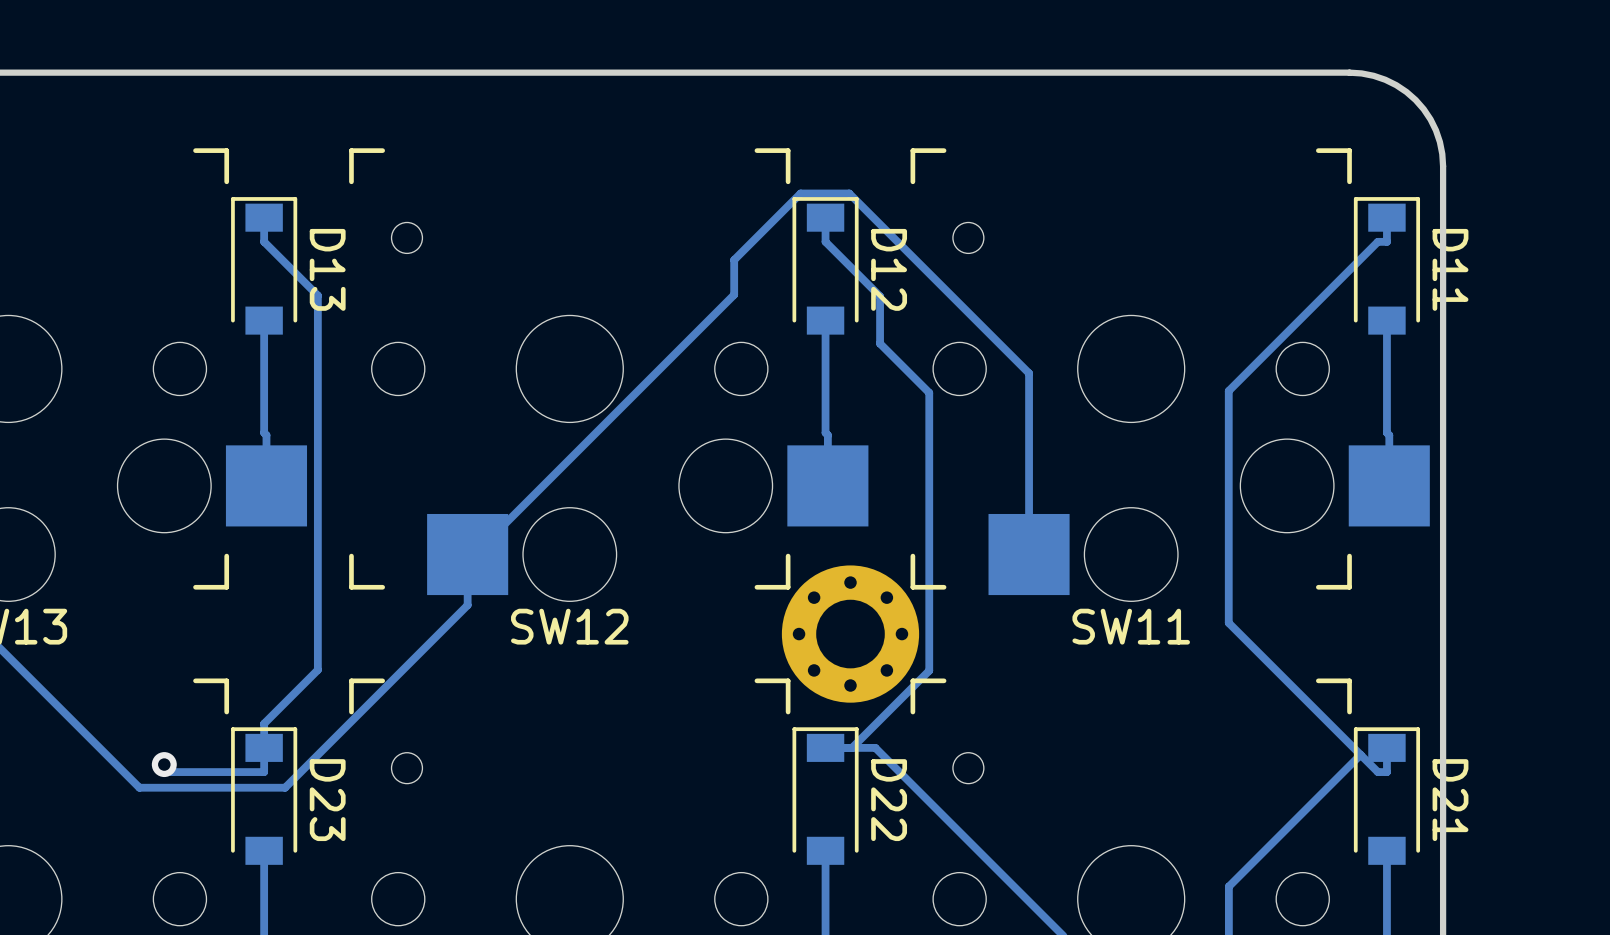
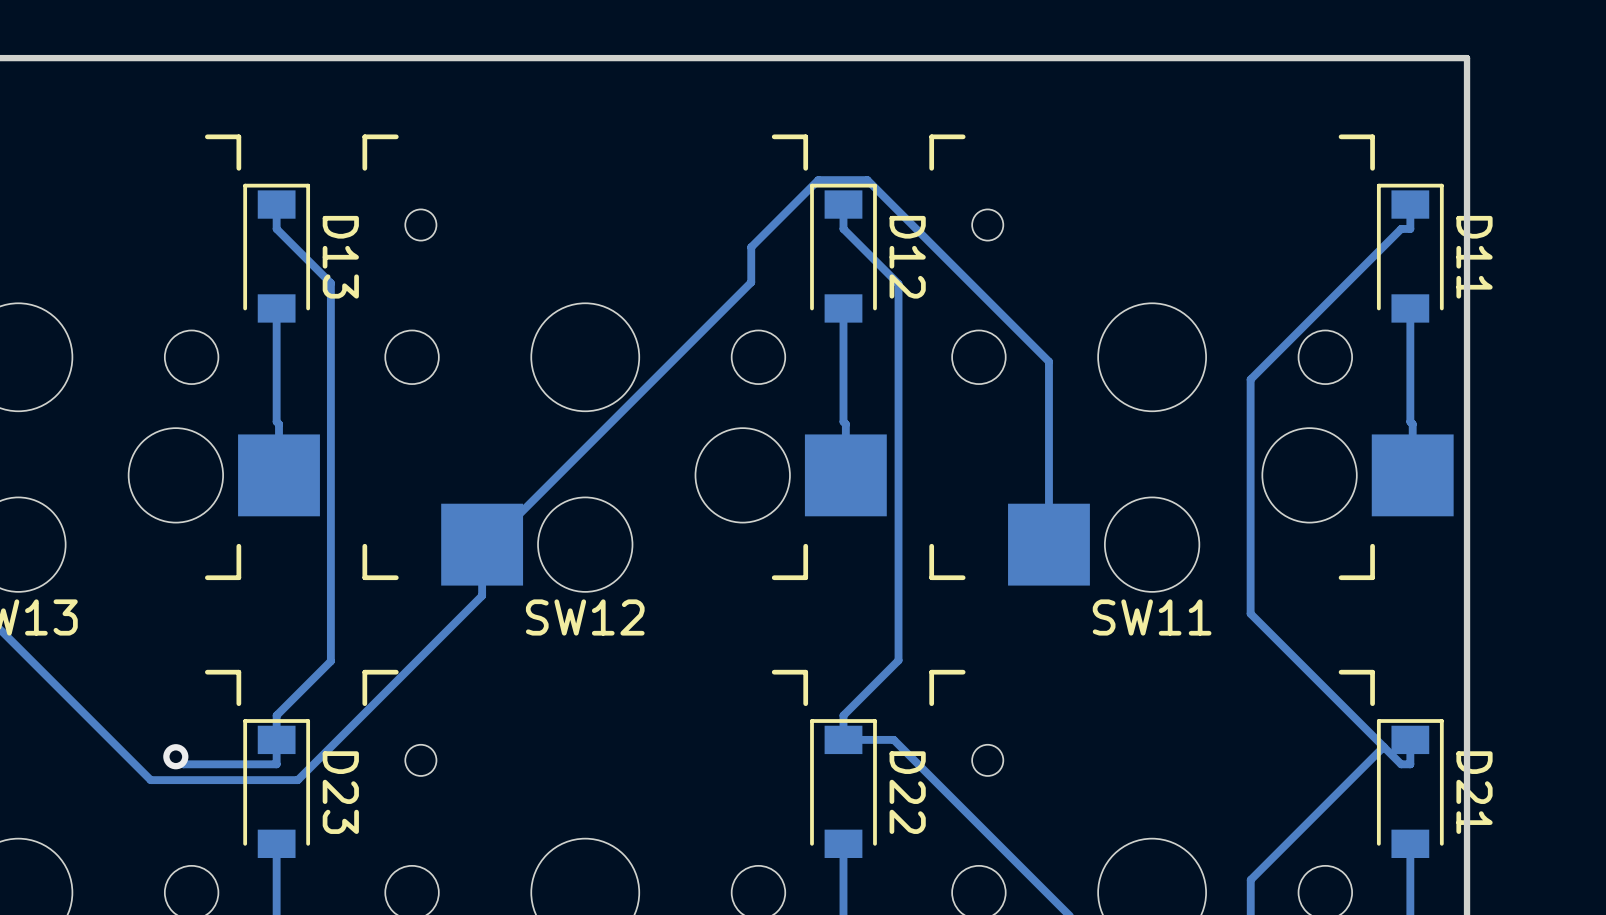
board edge: (1349, 72) (1373, 75) (1385, 79) (1406, 91) (1415, 100) (1423, 109) (1435, 130) (1439, 141) (1443, 166) -> (1372, 58) (1467, 58) (1467, 152)
track: (880, 343) (929, 392) (929, 670) (852, 747) -> (898, 331) (898, 660) (843, 715) (843, 739)
part: (850, 634) -> none

